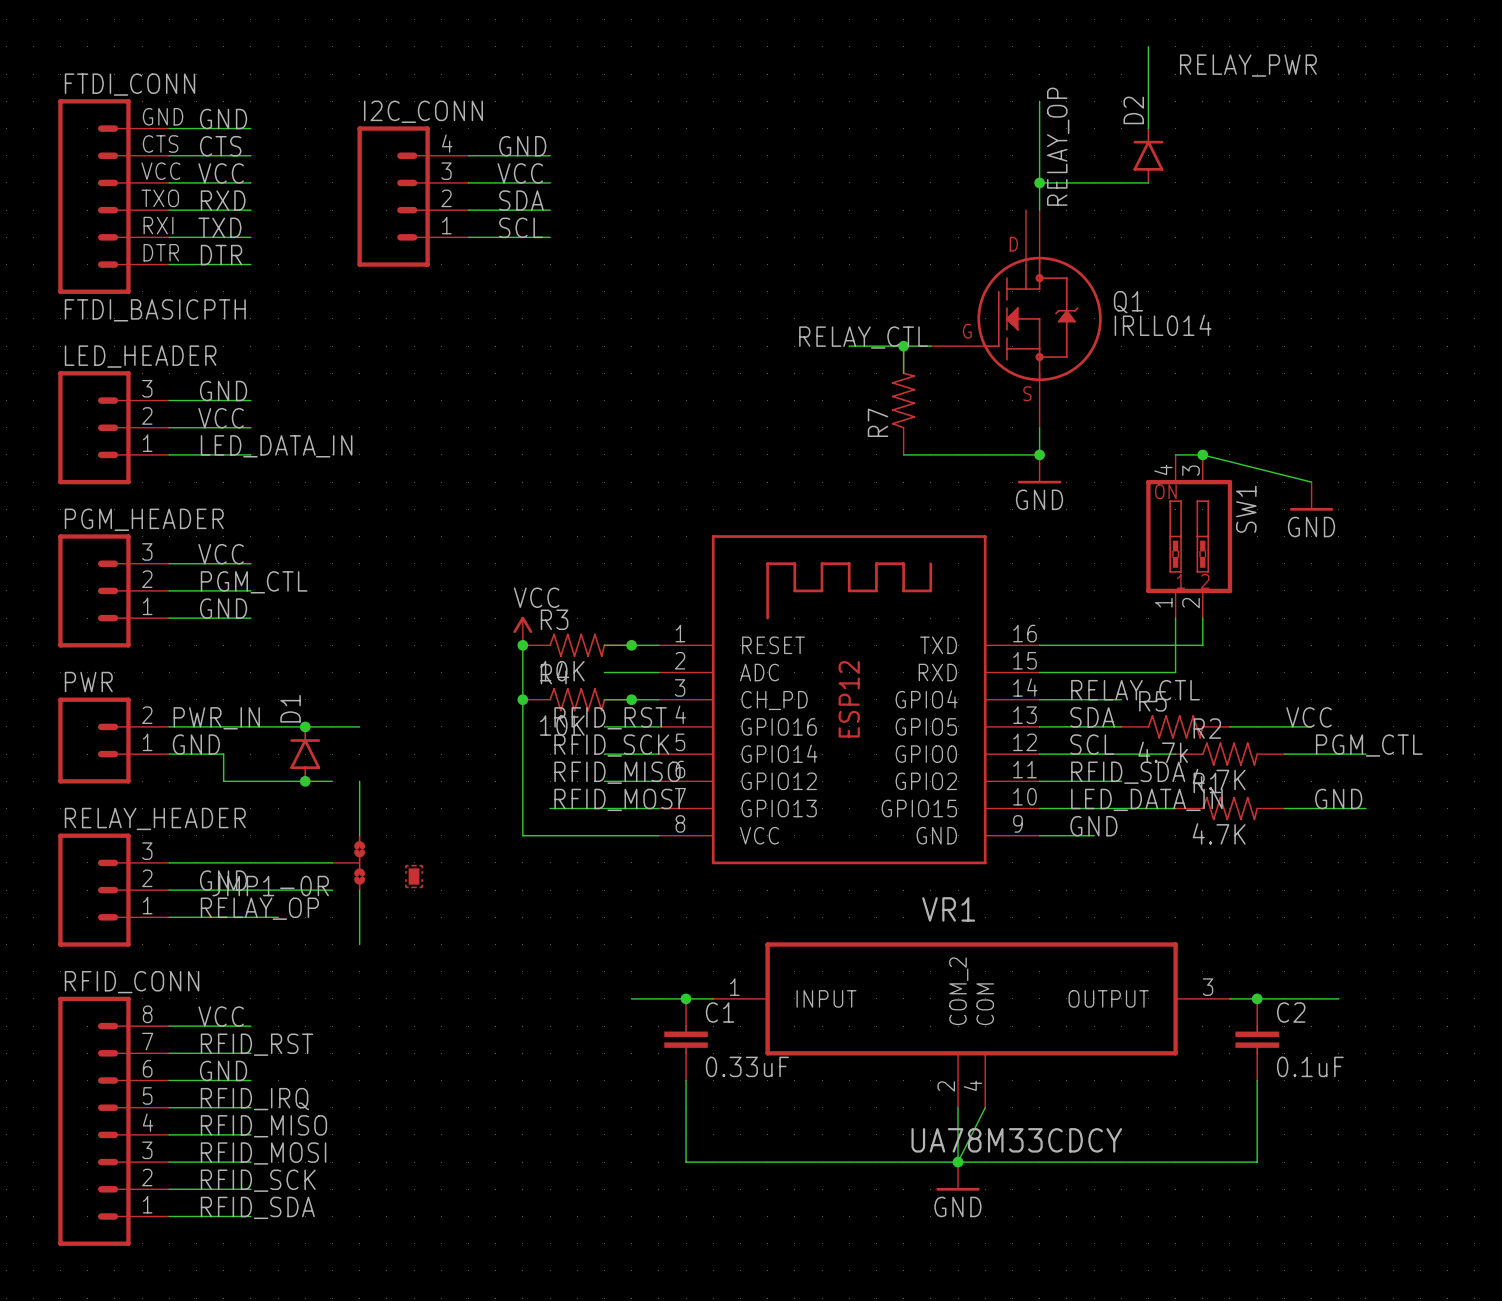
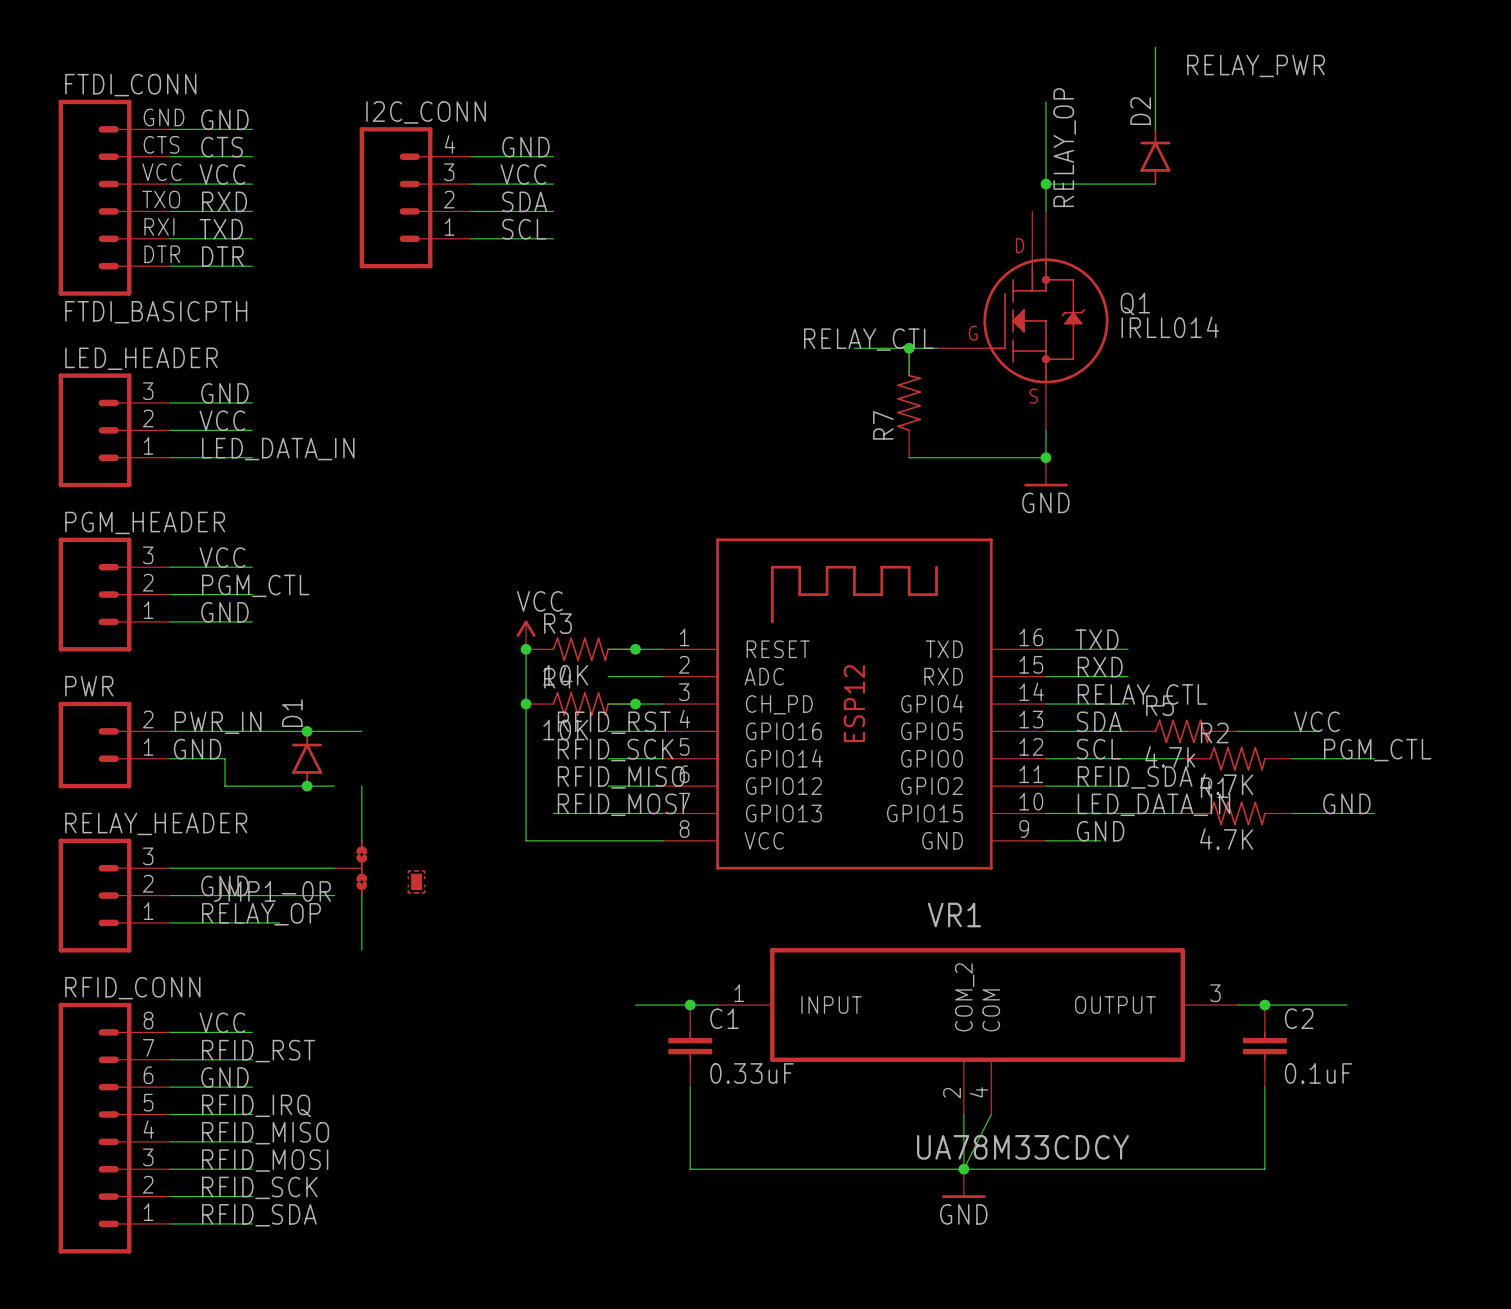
wire: (1175, 454) (1202, 454) (1311, 482) -> none
junction: (1202, 454) -> none
power symbol: GND (1311, 496) -> none
SW1: (1189, 536) -> none
wire: (1175, 618) (1175, 672) (1121, 672) -> none
wire: (1202, 618) (1202, 645) (1121, 645) -> none
label: none -> TXD (1096, 639)
label: none -> RXD (1100, 667)

